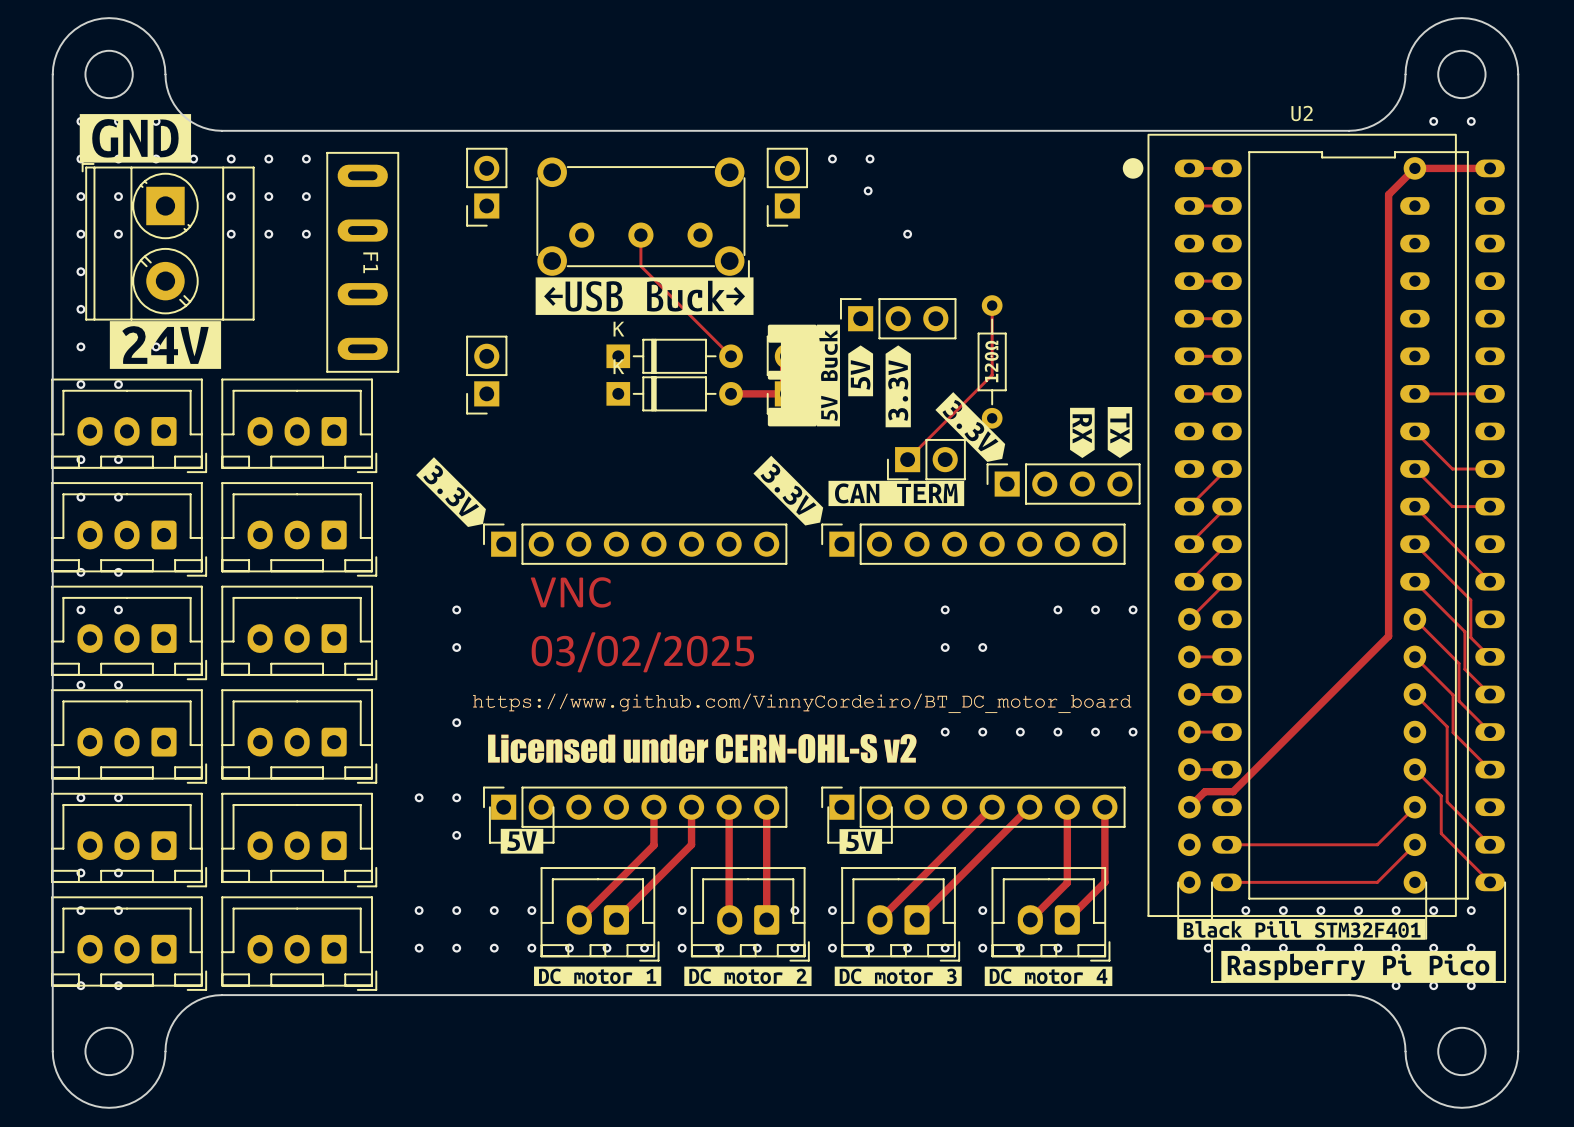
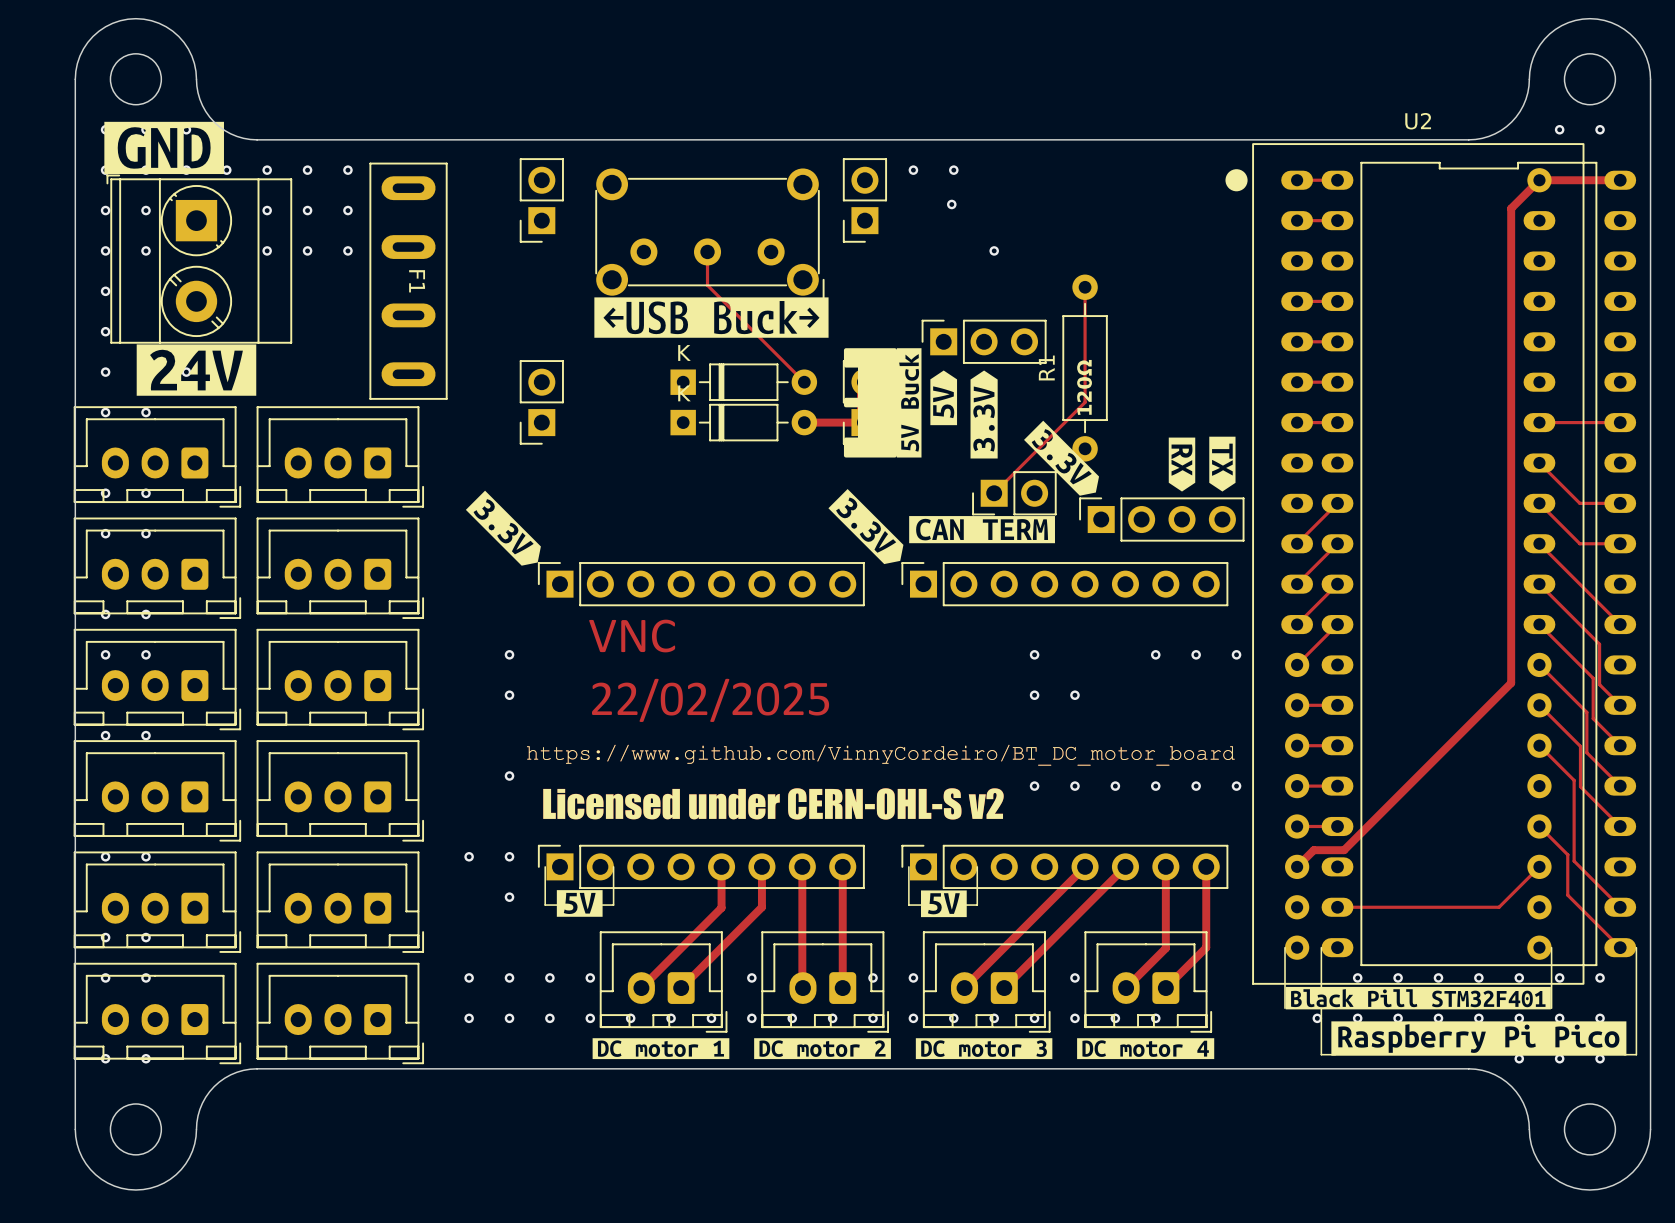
track: none -> (1085, 287) (1085, 327)
R1: none -> (1085, 368)
part: (992, 361) -> none
drawing shape: [531, 635, 553, 667] -> [592, 682, 612, 715]
drawing shape: [556, 635, 575, 667] -> [617, 682, 638, 715]
track: (1414, 844) (1377, 882) (1227, 882) -> none

